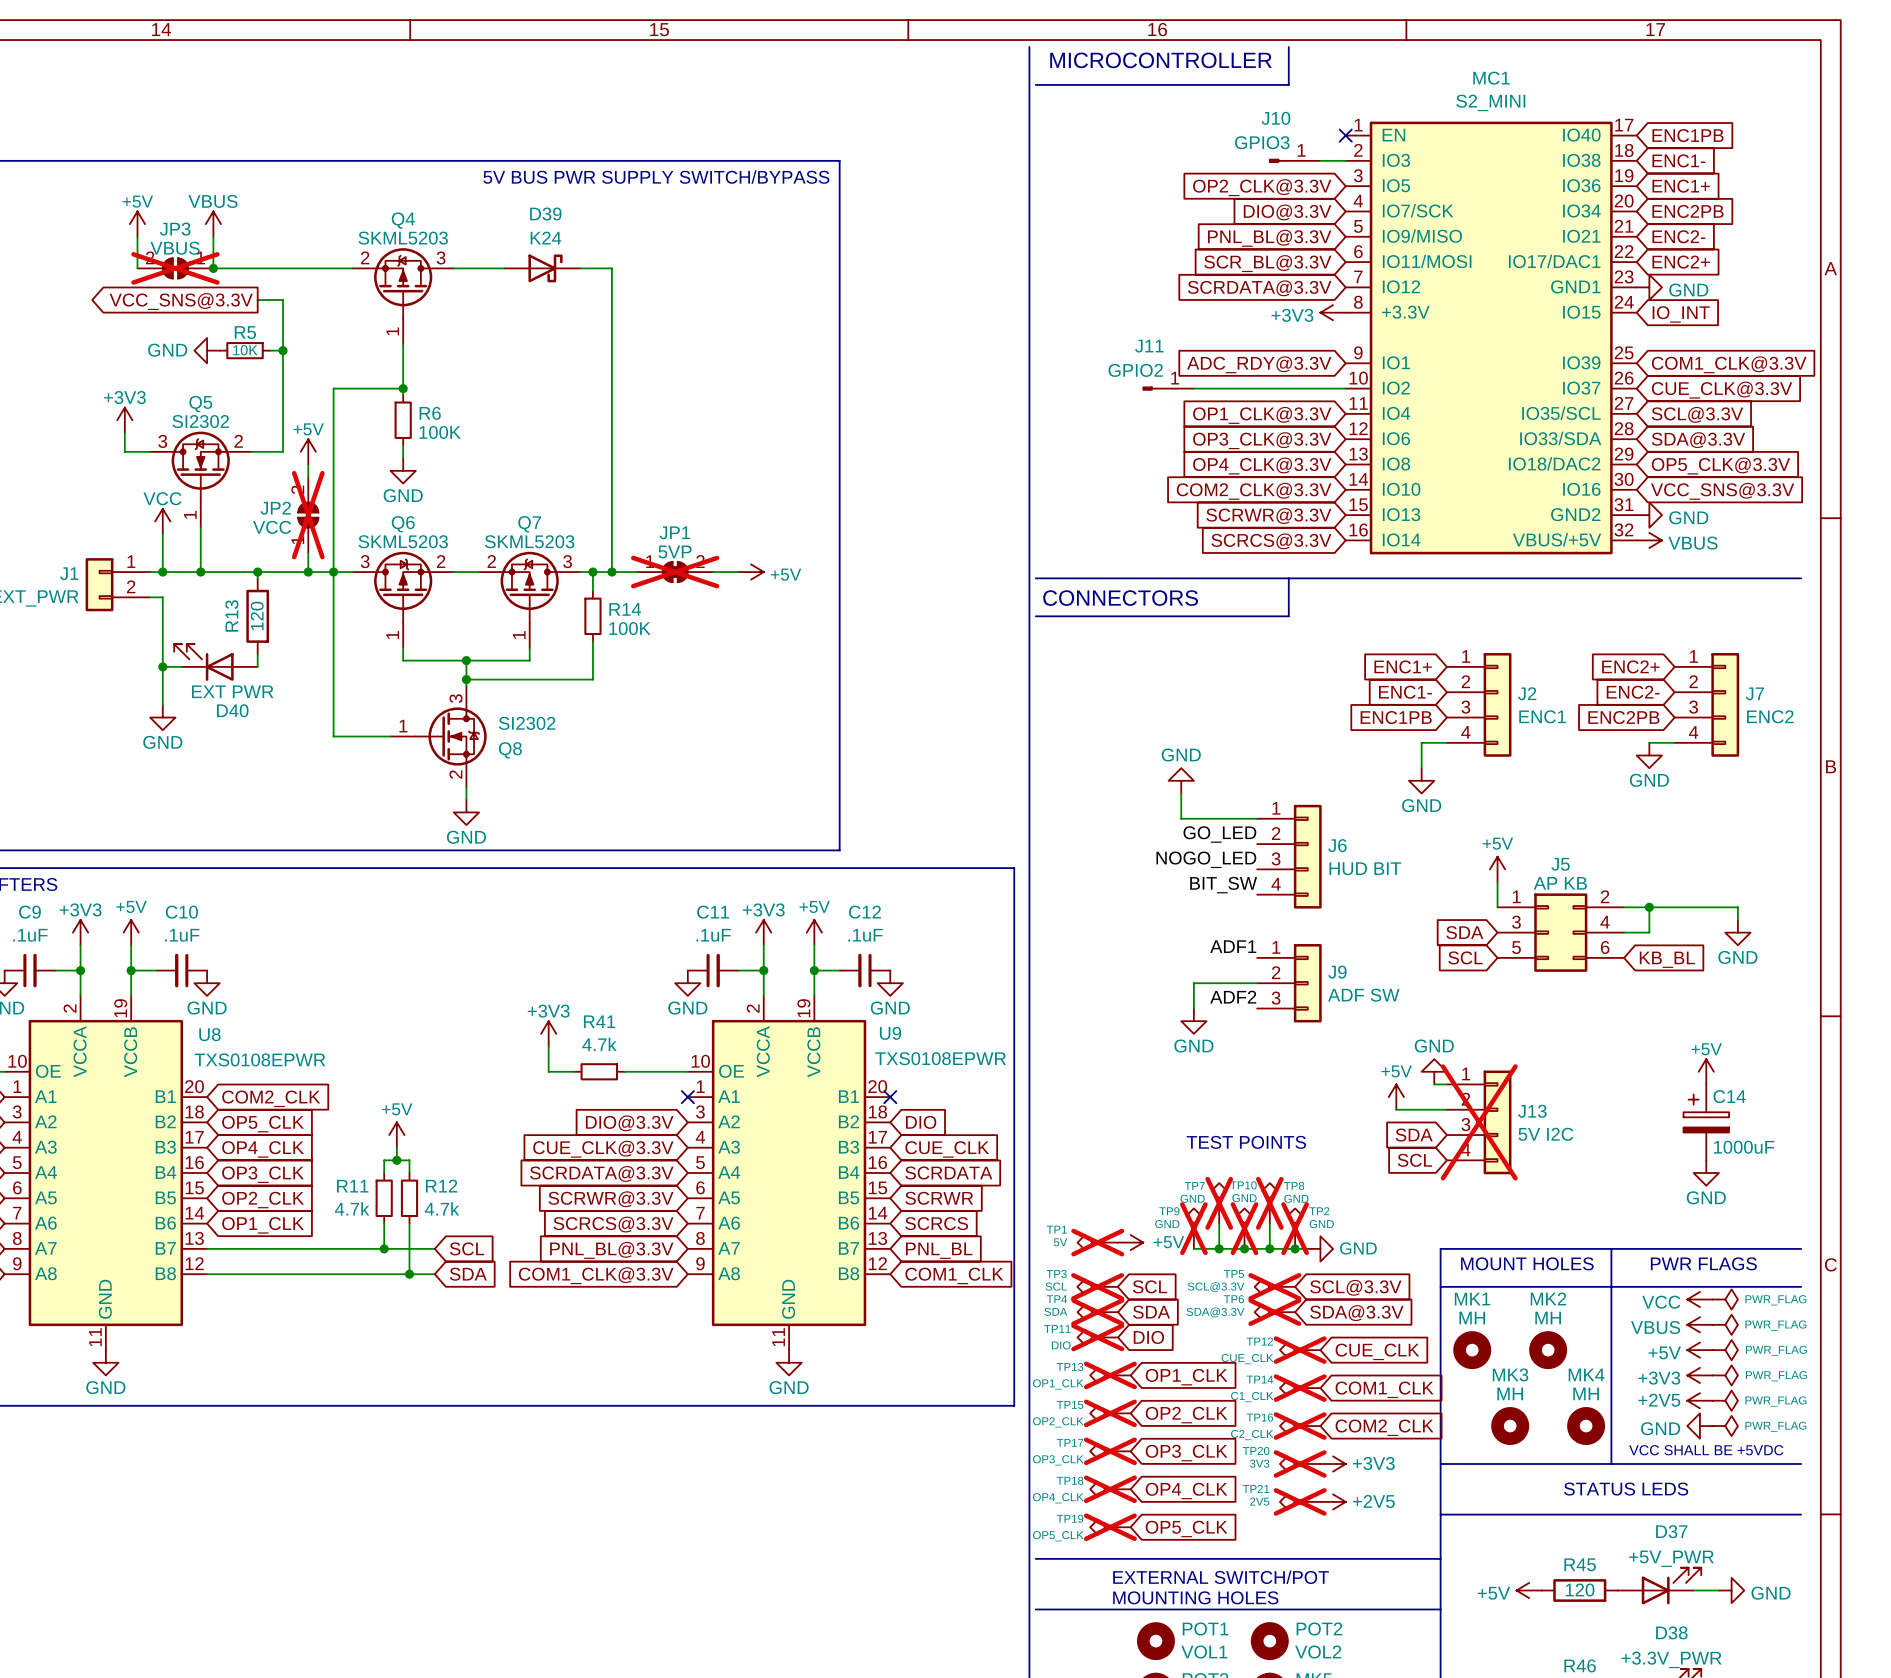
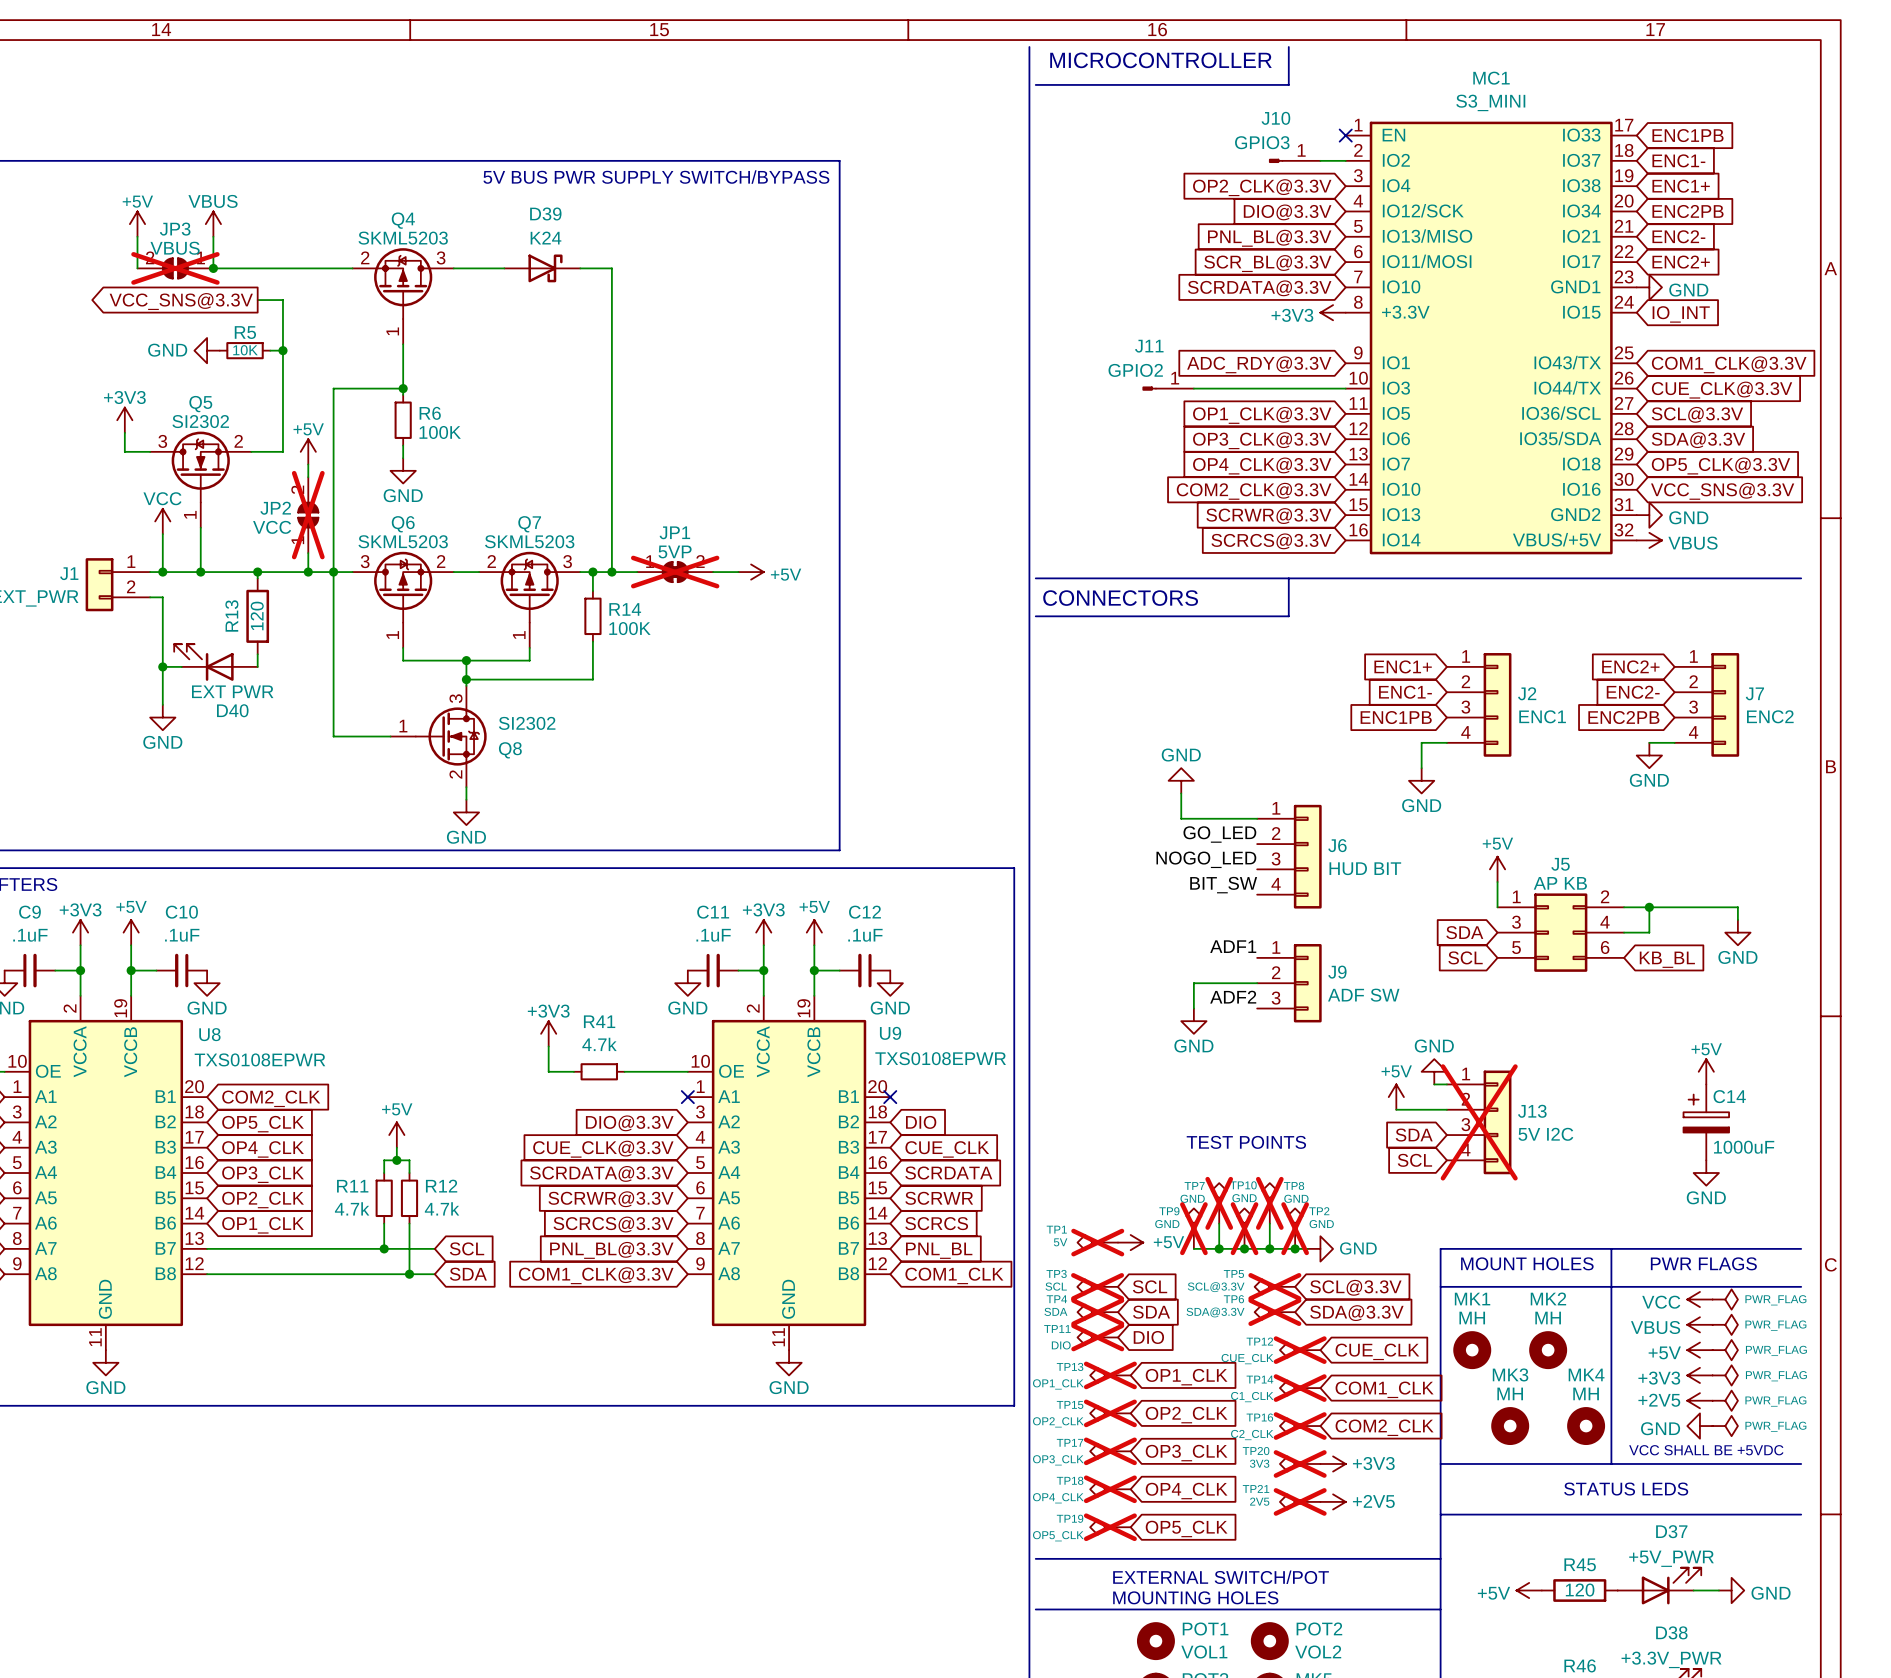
MC1 value: S2_MINI (1490, 102) -> S3_MINI (1490, 102)
MC1 symbol: [1345, 121, 1637, 555] -> [1345, 121, 1637, 555]

